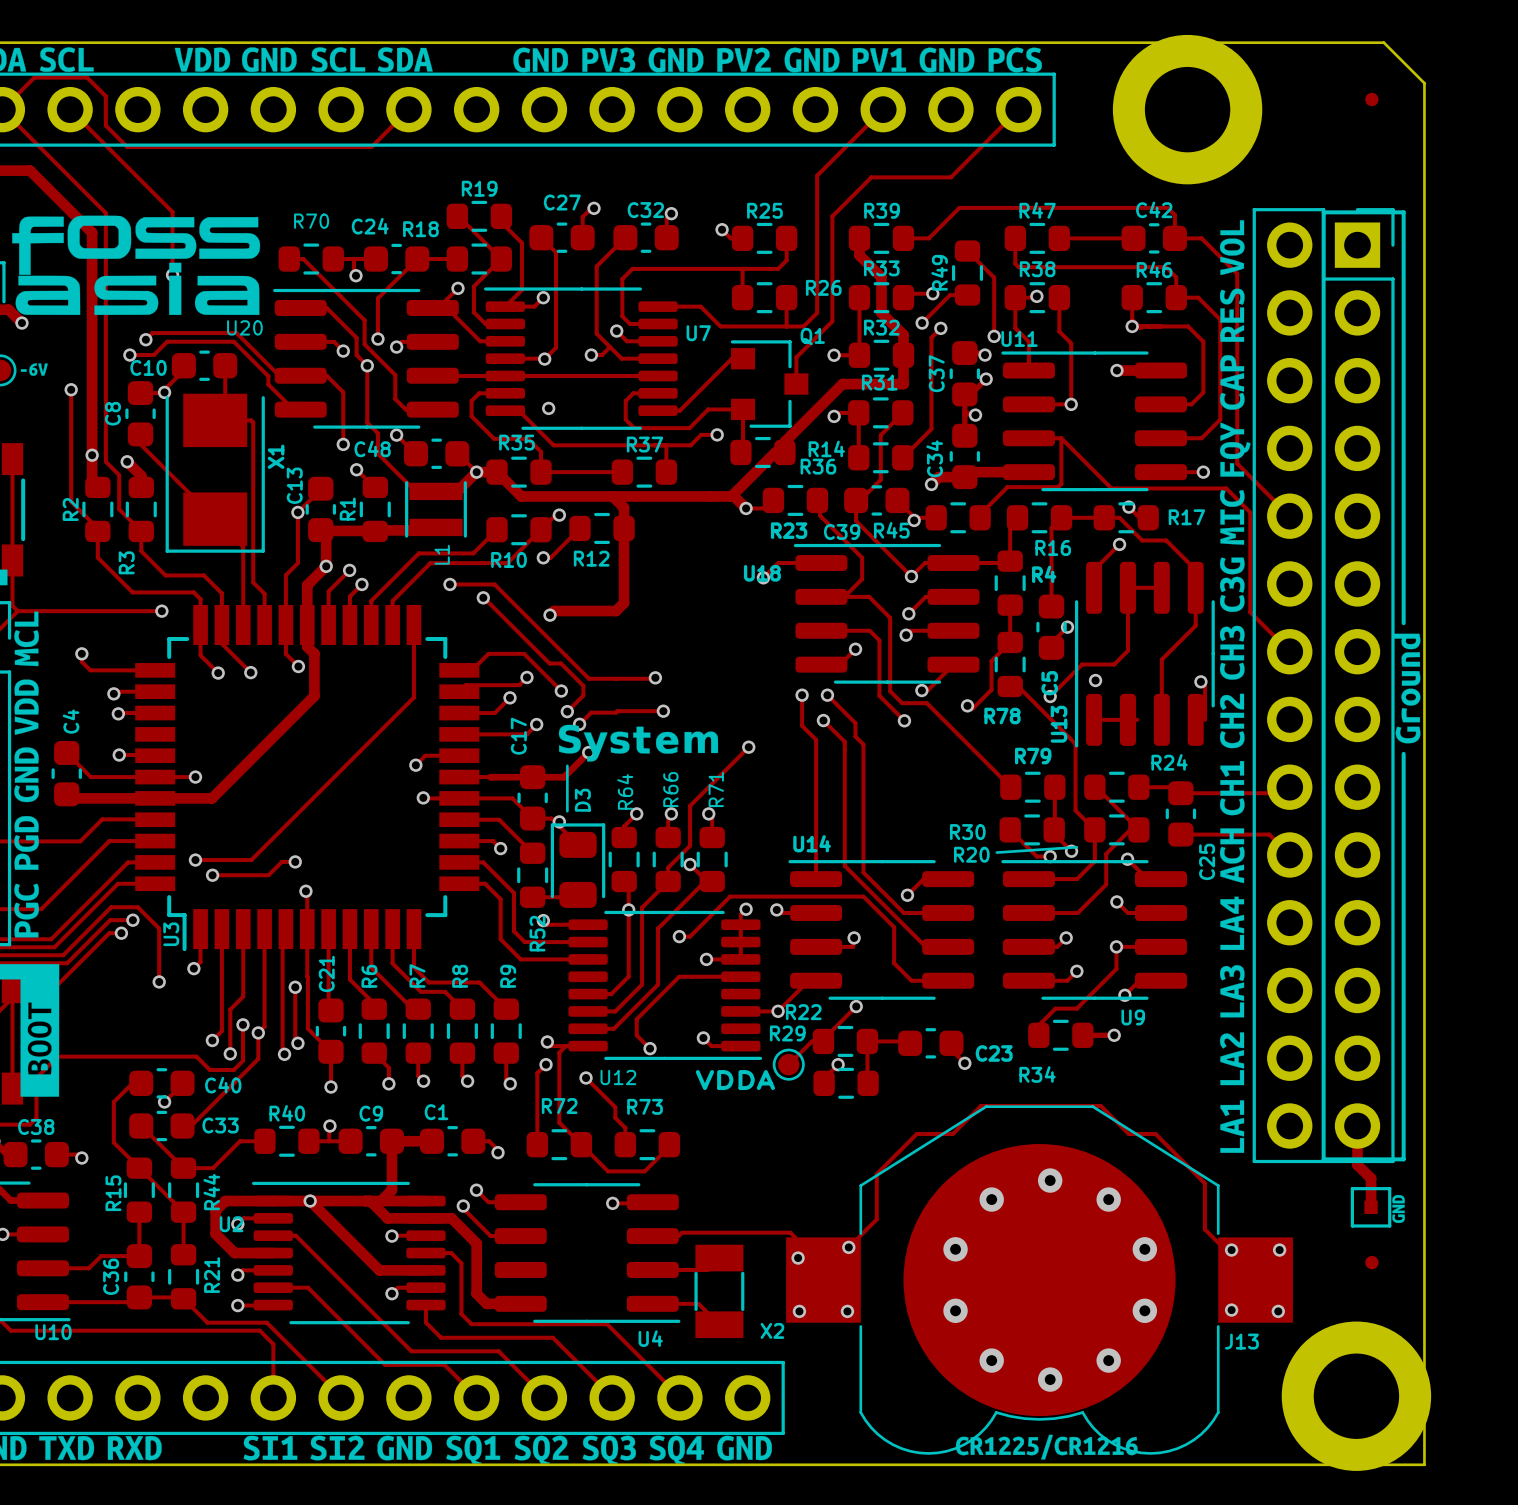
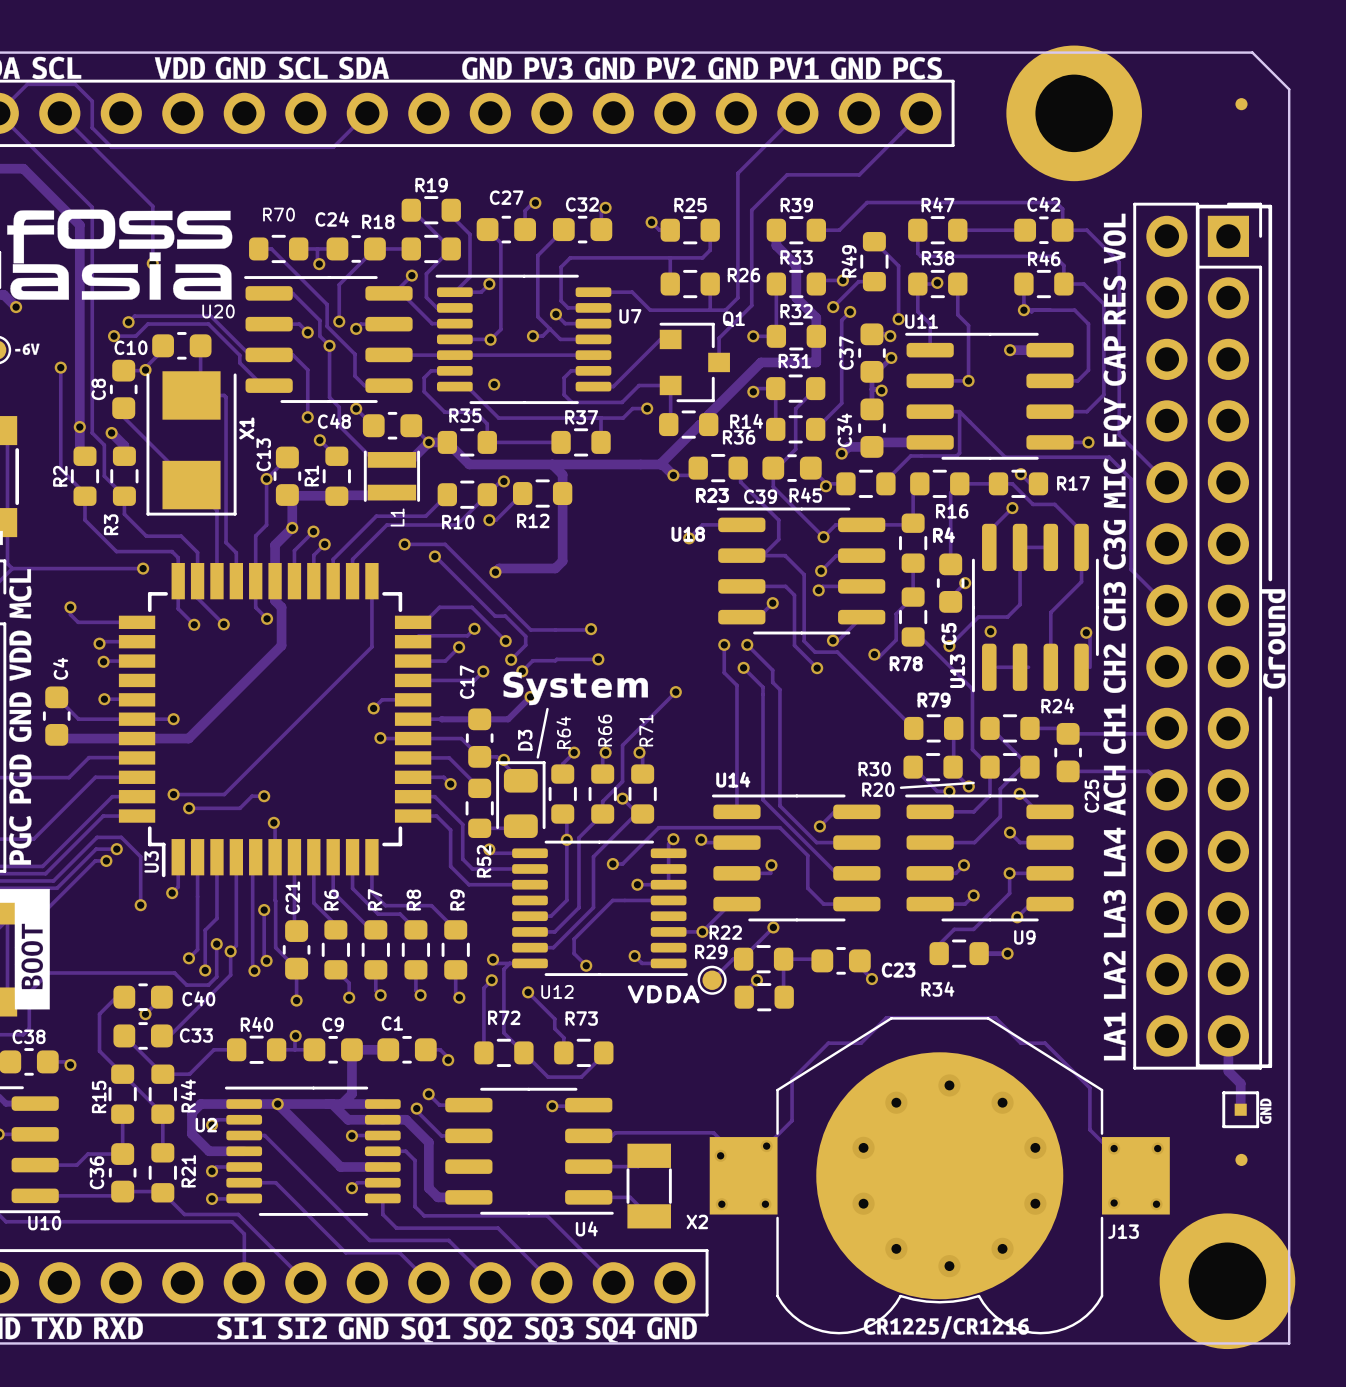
line: (567, 765) (567, 811) -> none
line: none -> (547, 709) (537, 757)

